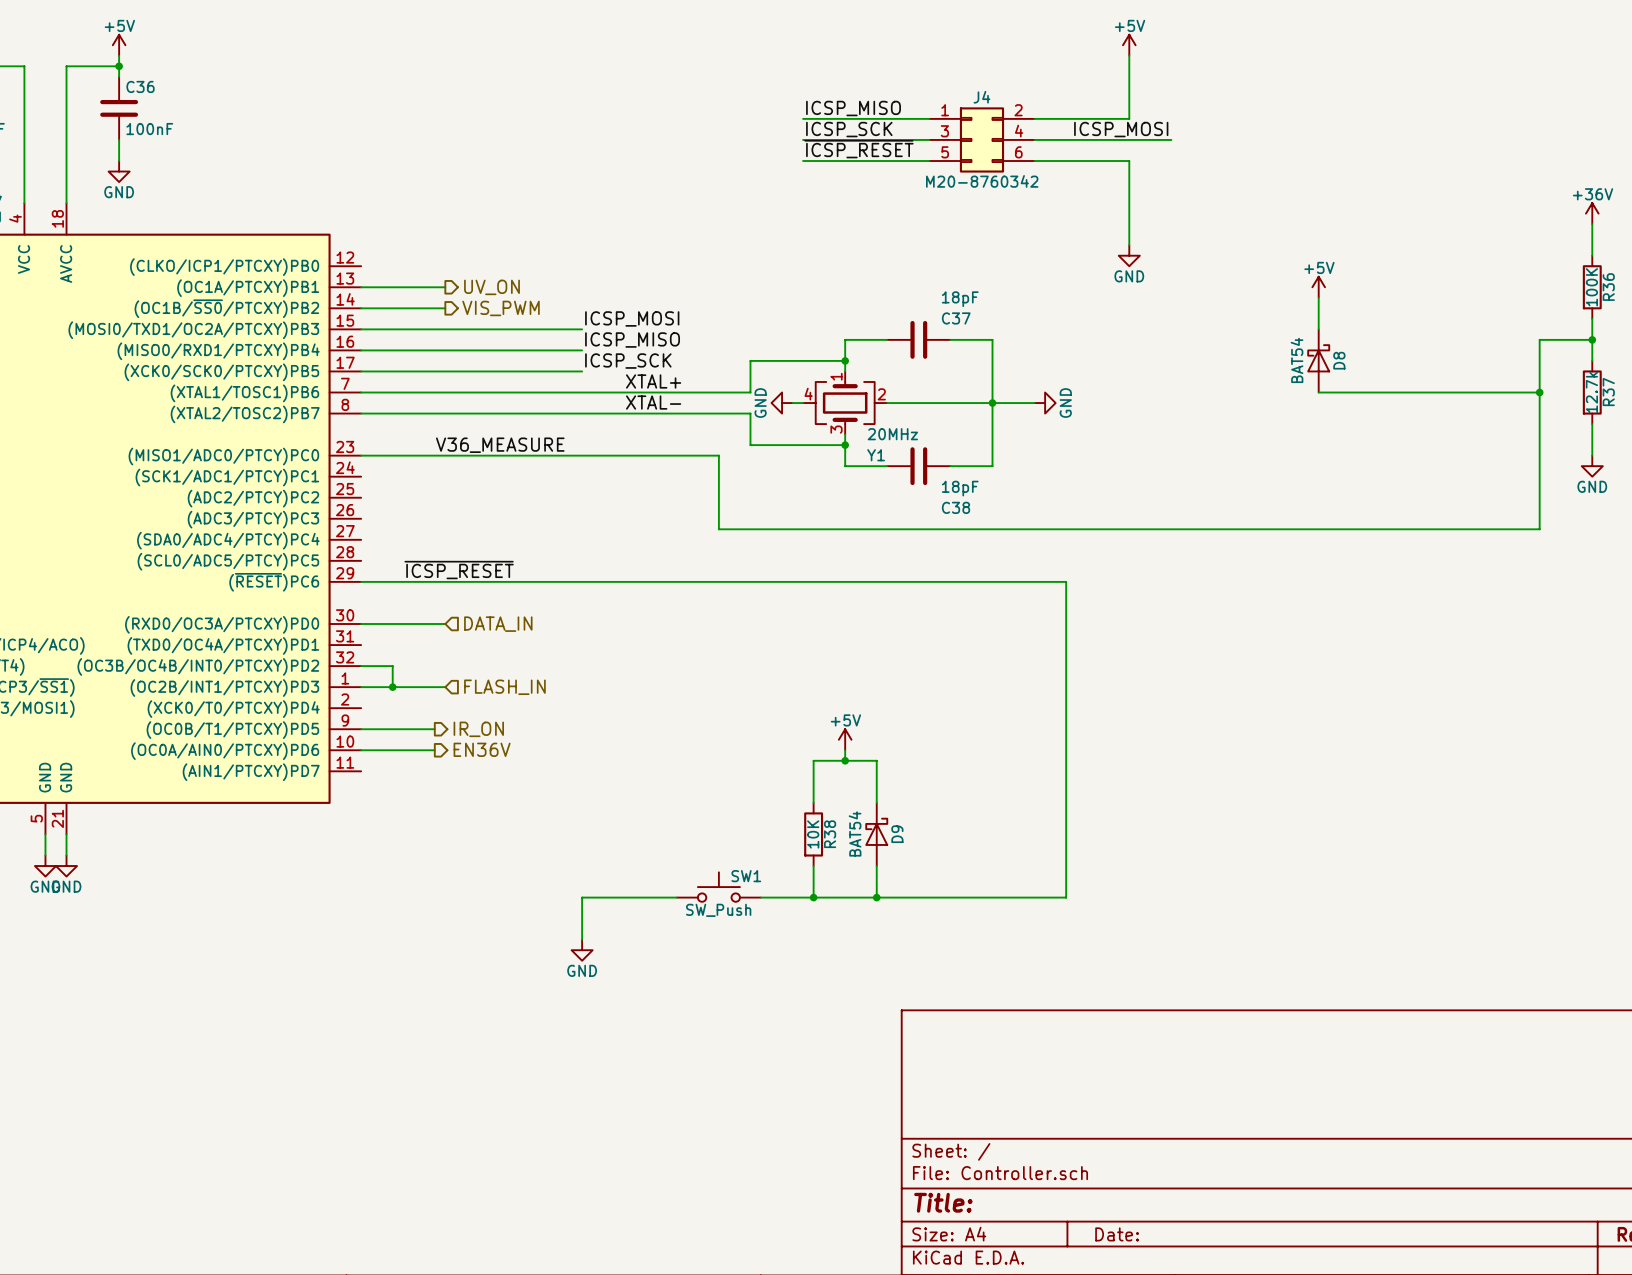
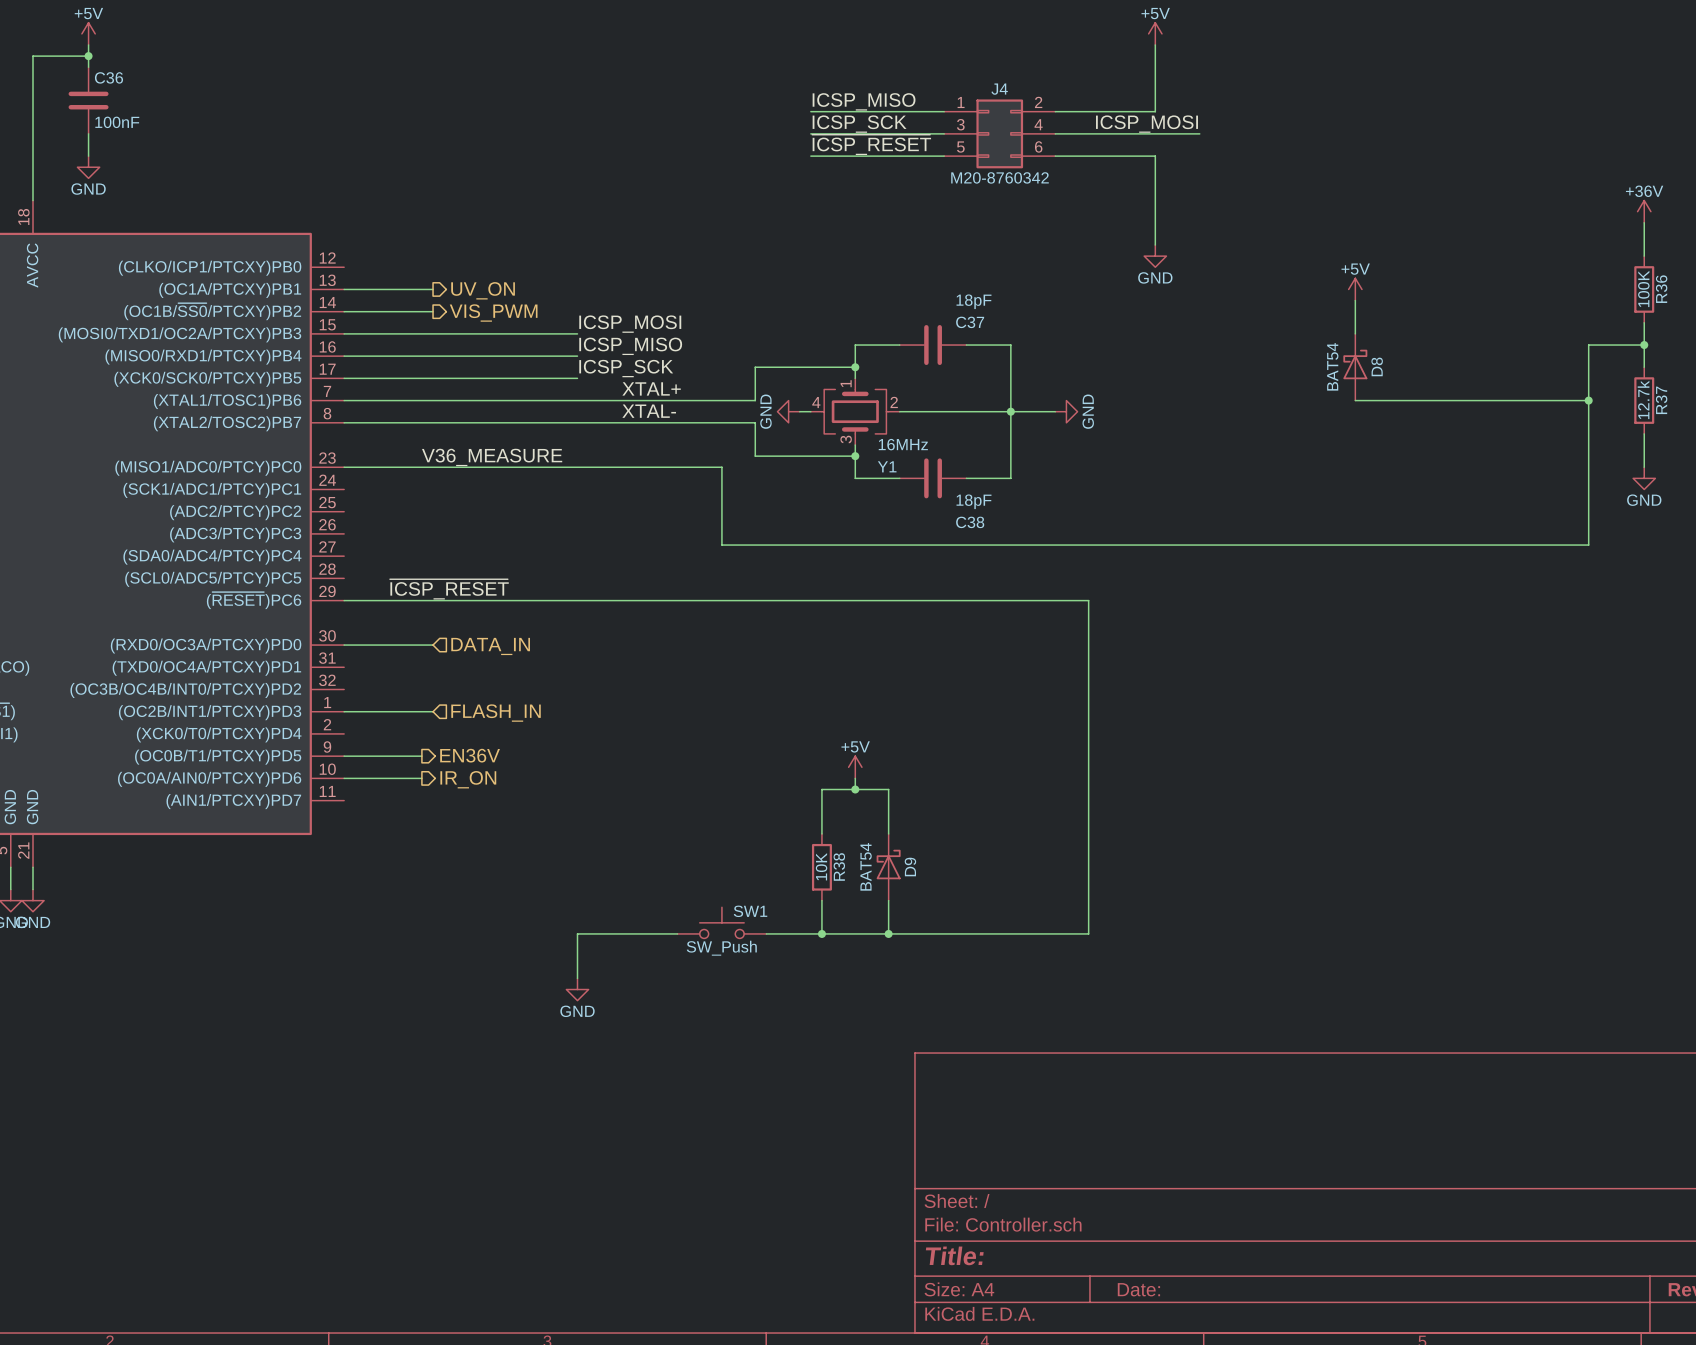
Y1 value: 20MHz (892, 434) -> 16MHz (903, 444)
wire: (361, 666) (392, 666) (392, 687) -> none
junction: (392, 687) -> none
hierarchical label: IR_ON (478, 729) -> EN36V (470, 755)
hierarchical label: EN36V (482, 749) -> IR_ON (468, 779)

